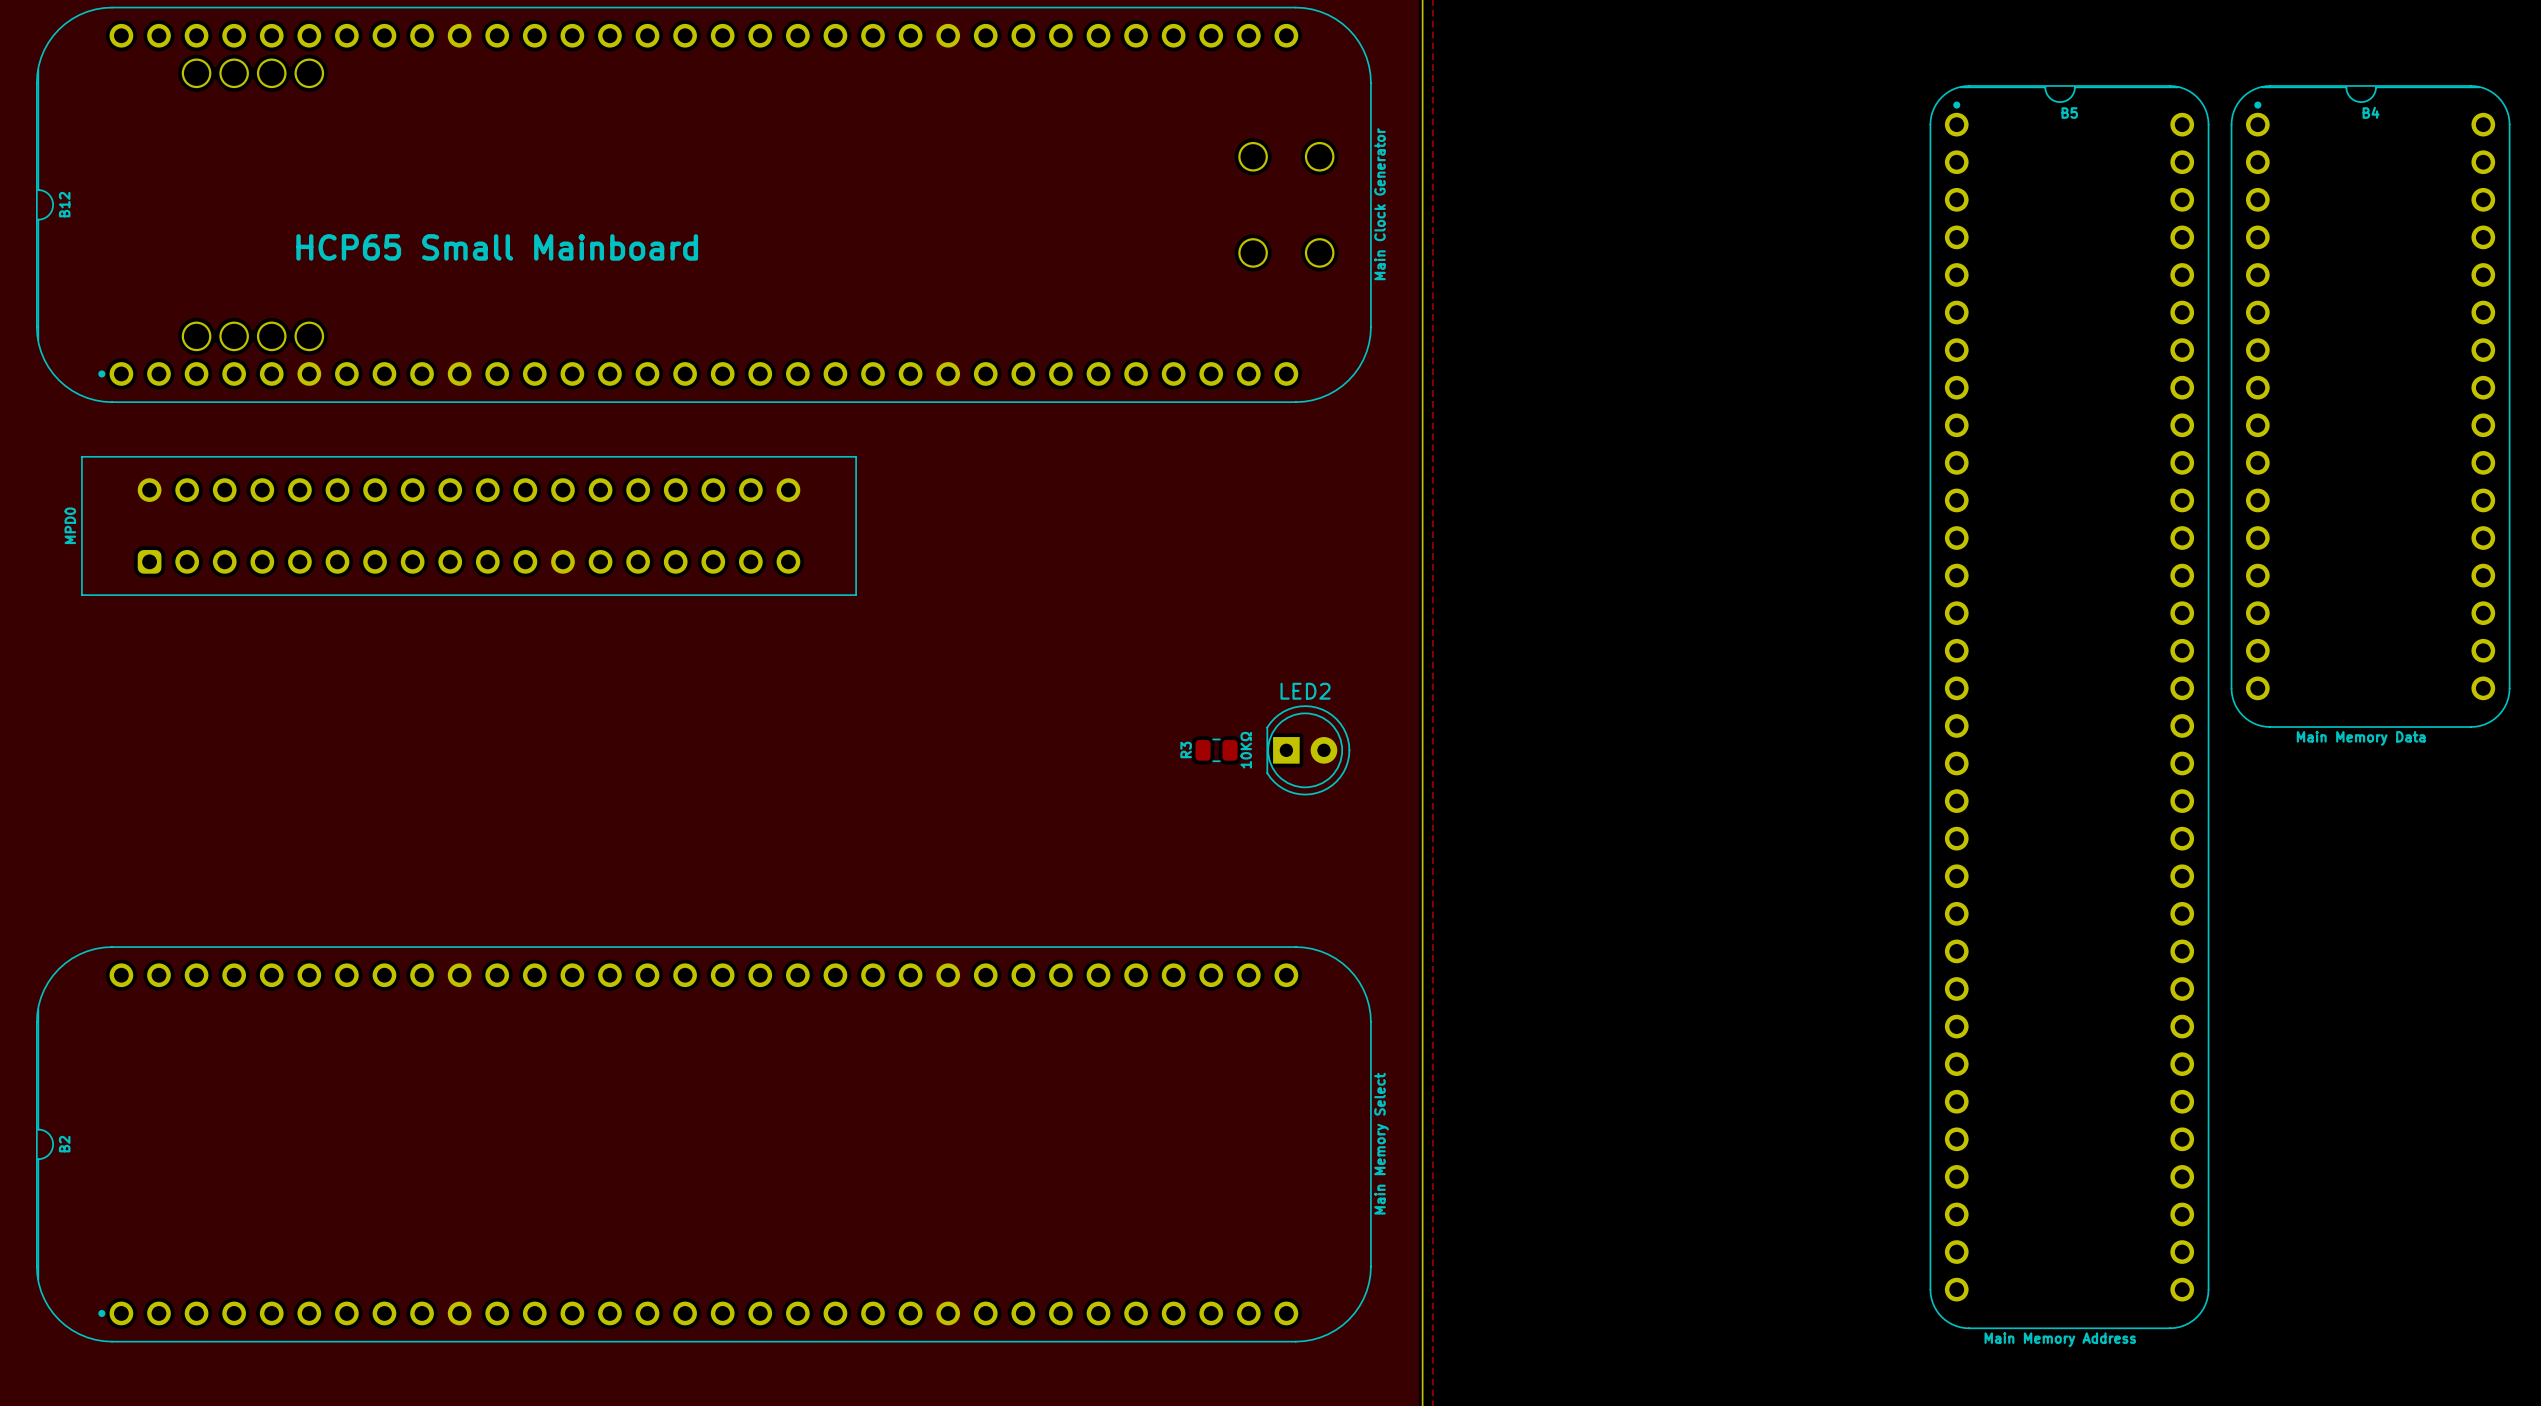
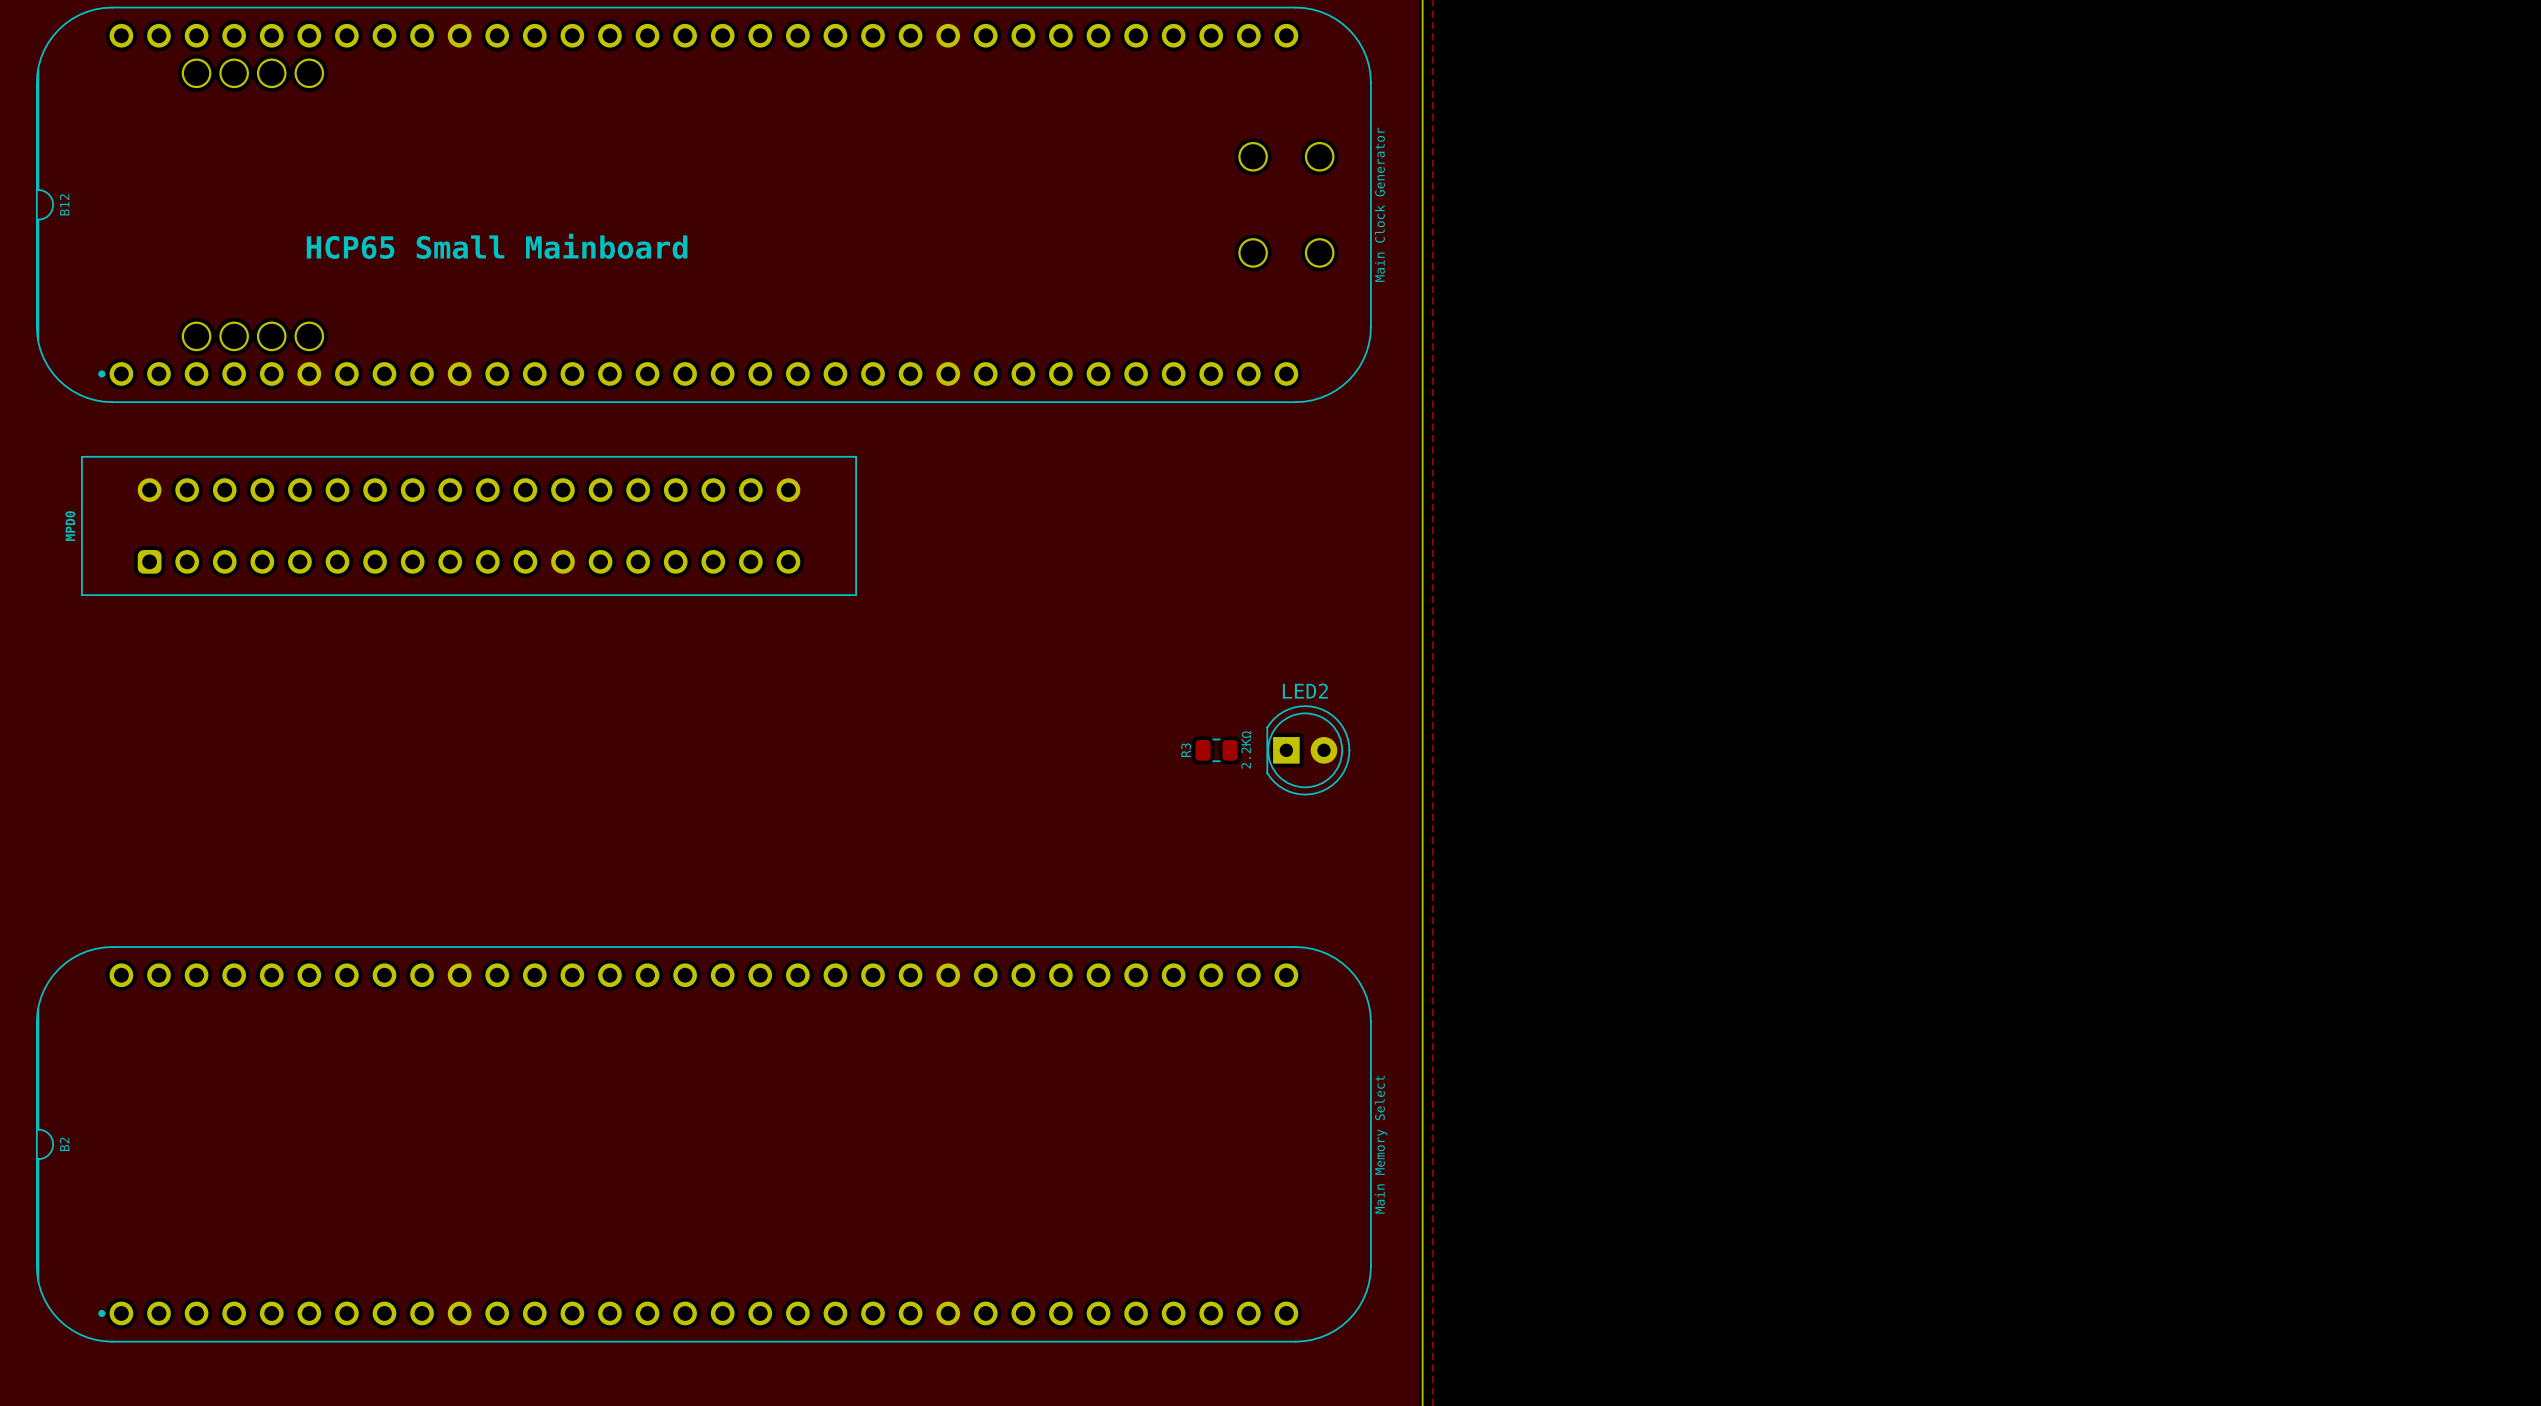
B4: (2370, 406) -> none
B5: (2069, 707) -> none
R3 value: 10KΩ (1246, 750) -> 2.2KΩ (1246, 749)

